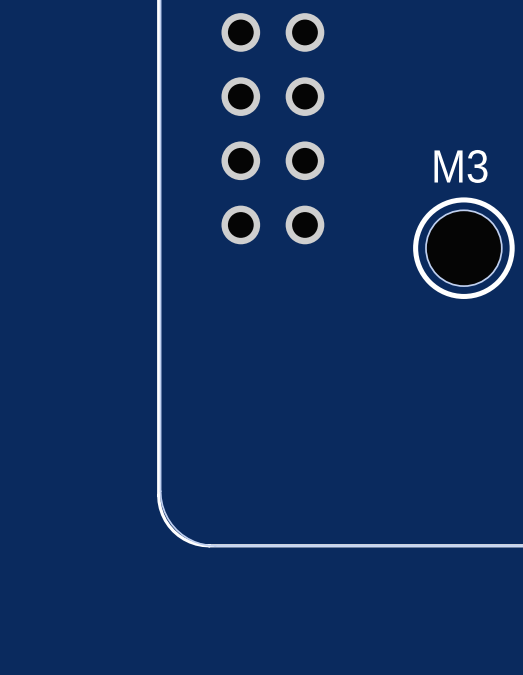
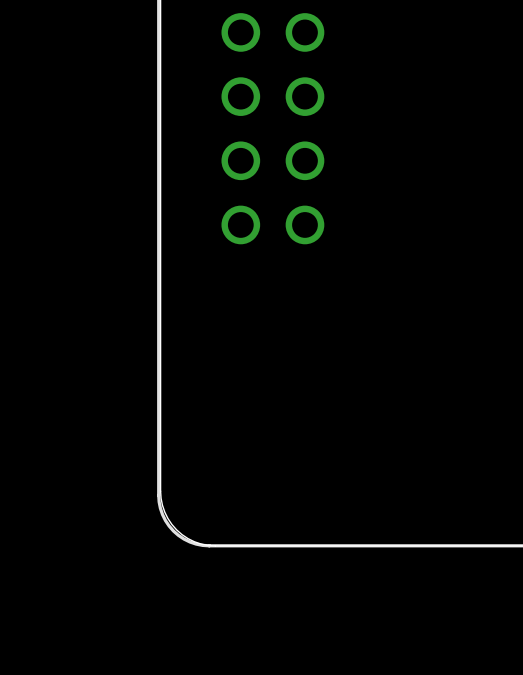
text: M3 (461, 166) -> none
drawing: [413, 197, 515, 300] -> none
hole: (463, 248) -> none

